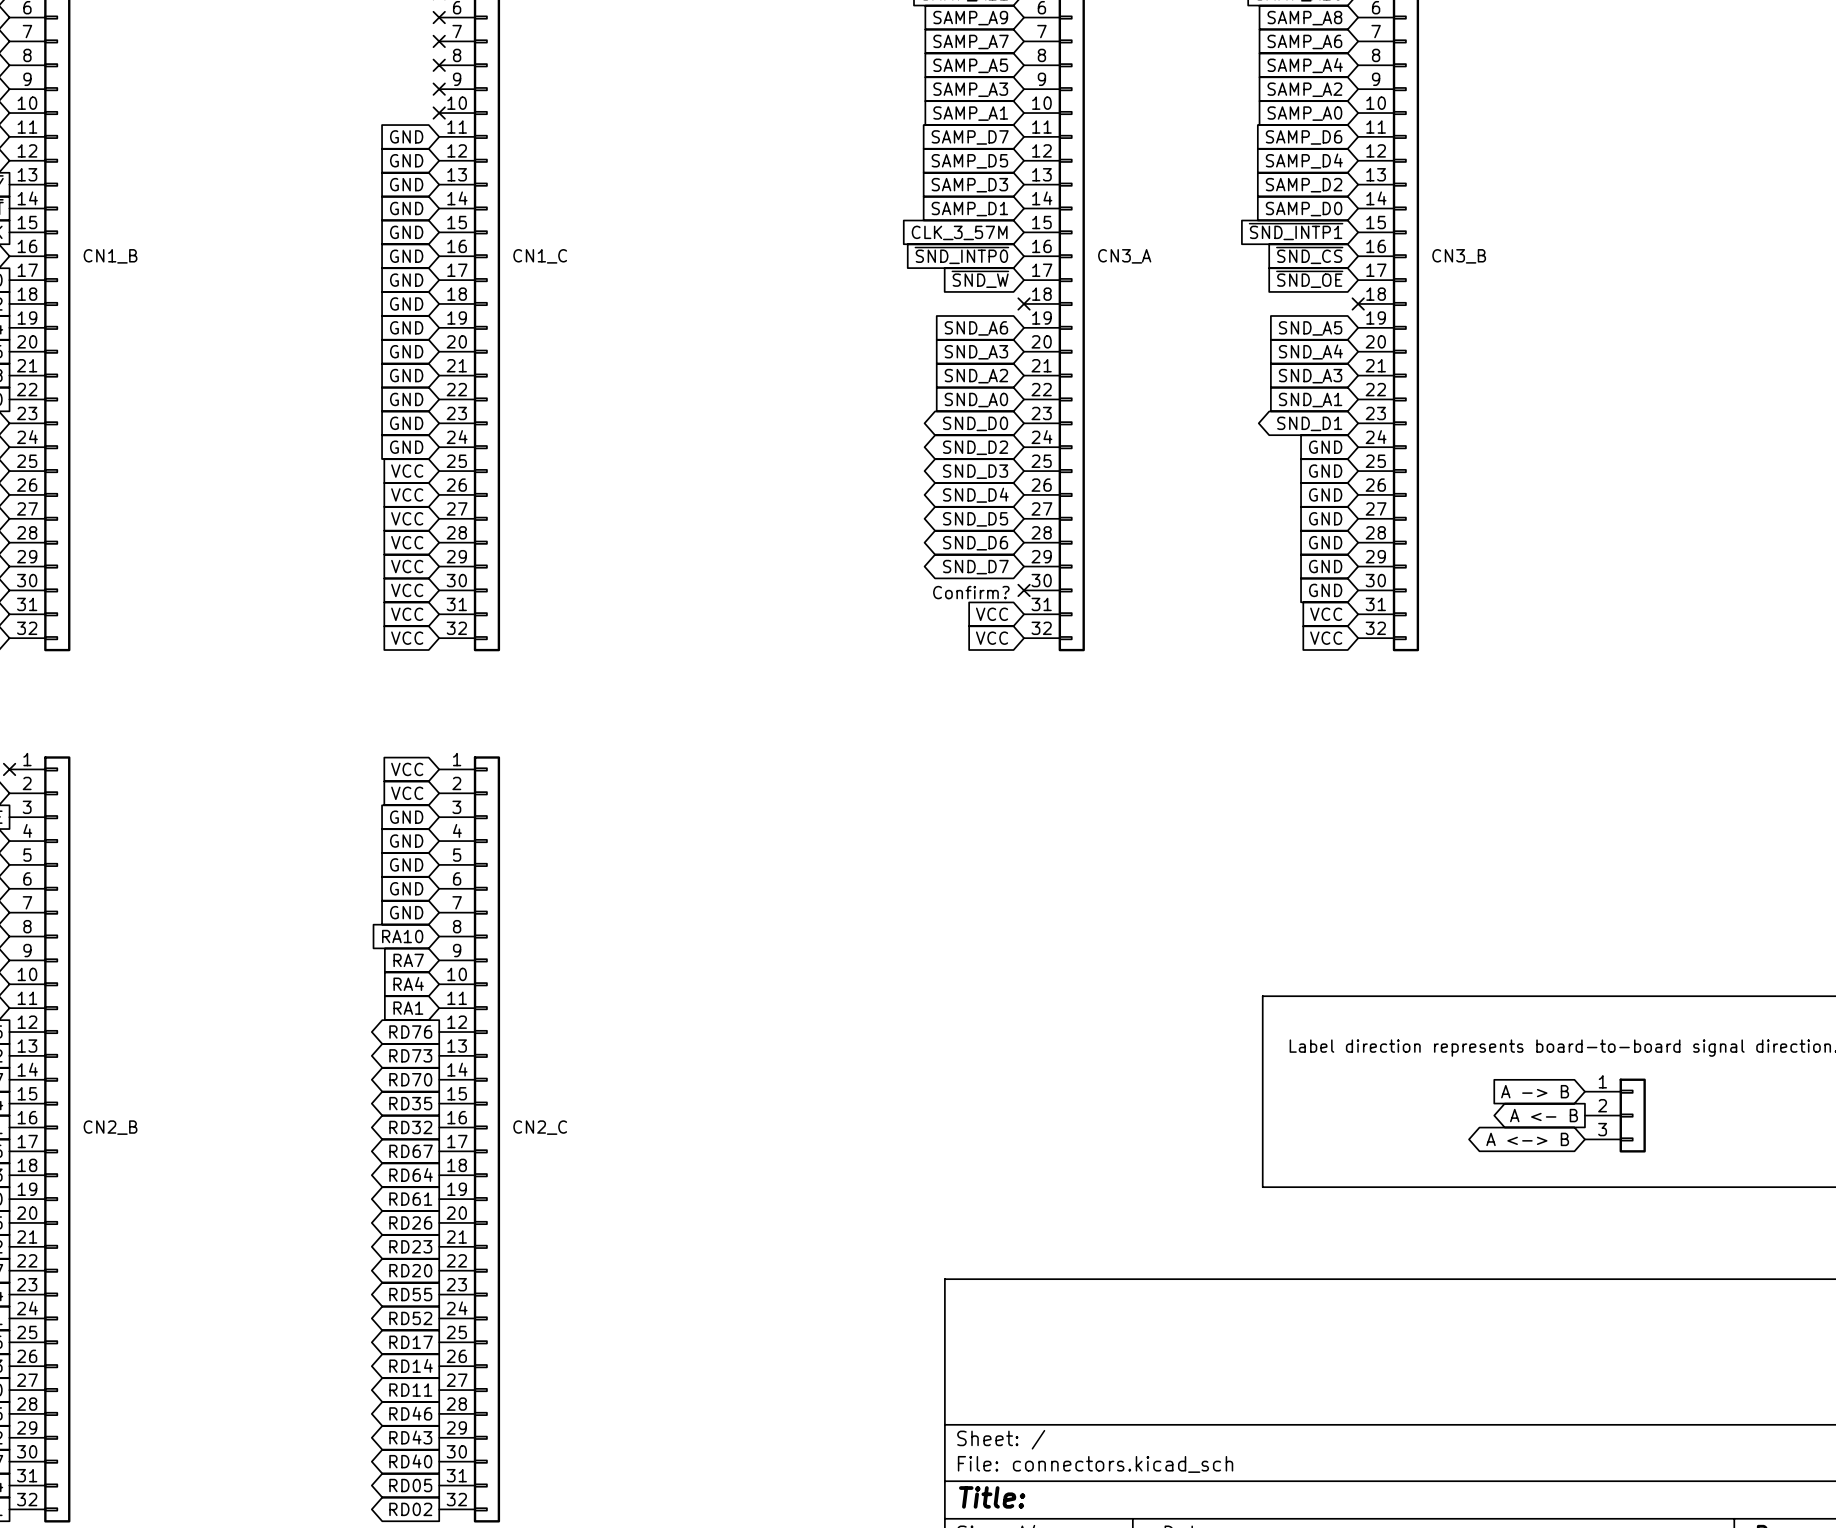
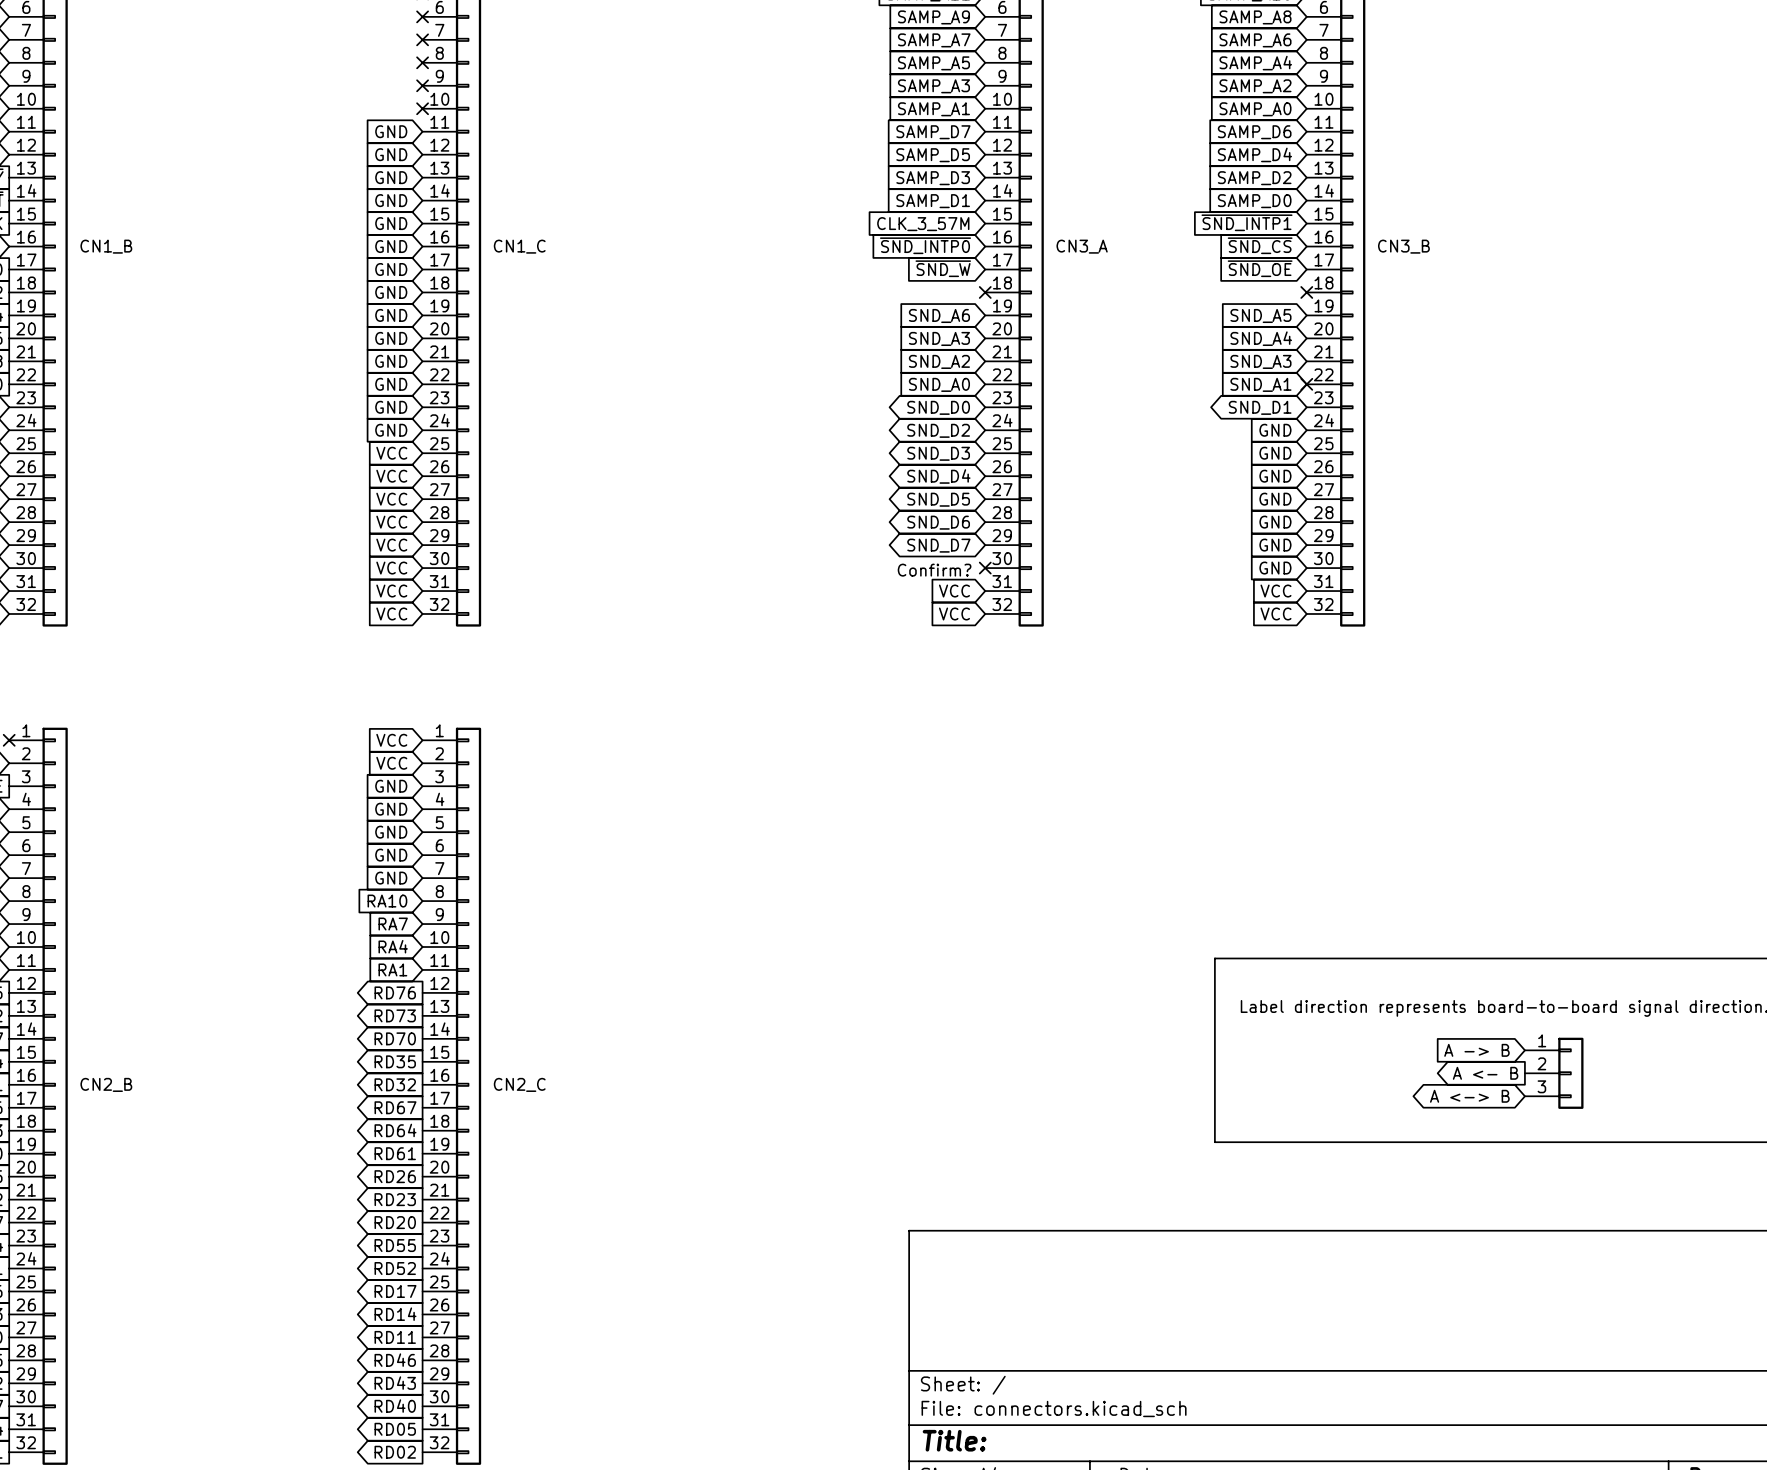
no-connect mark: none -> (1306, 384)

